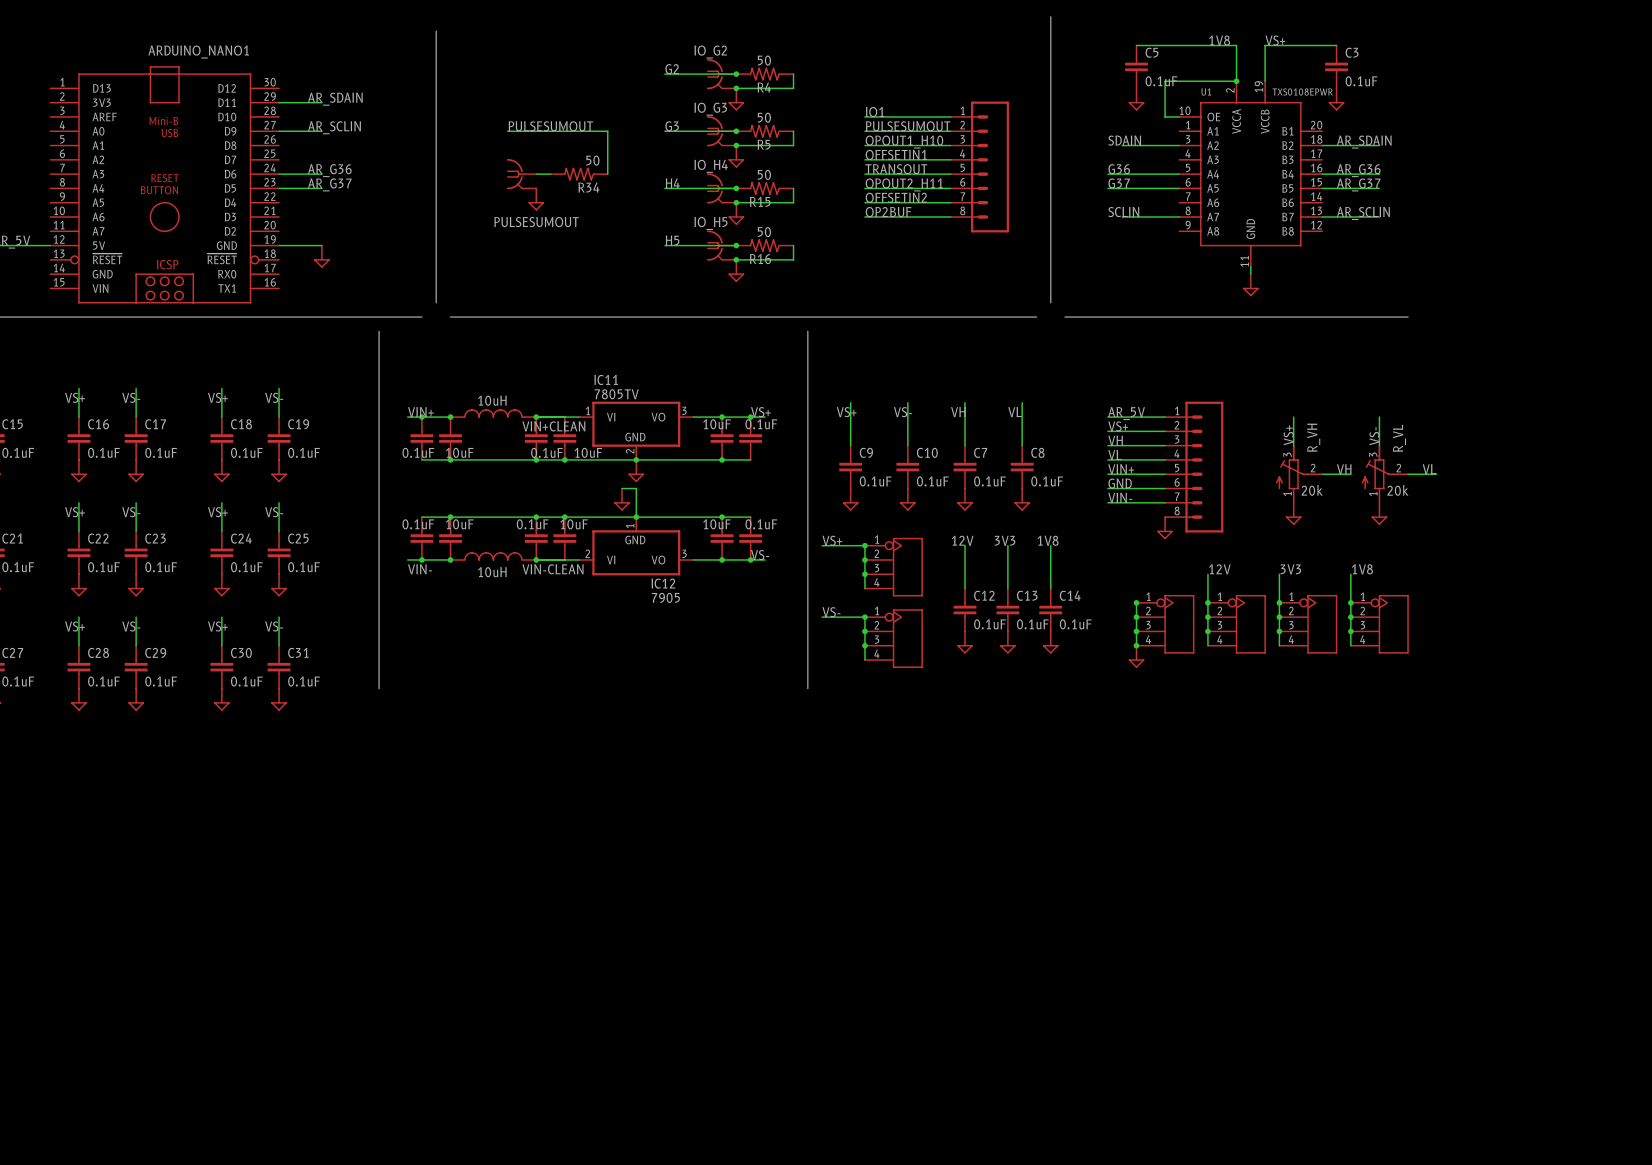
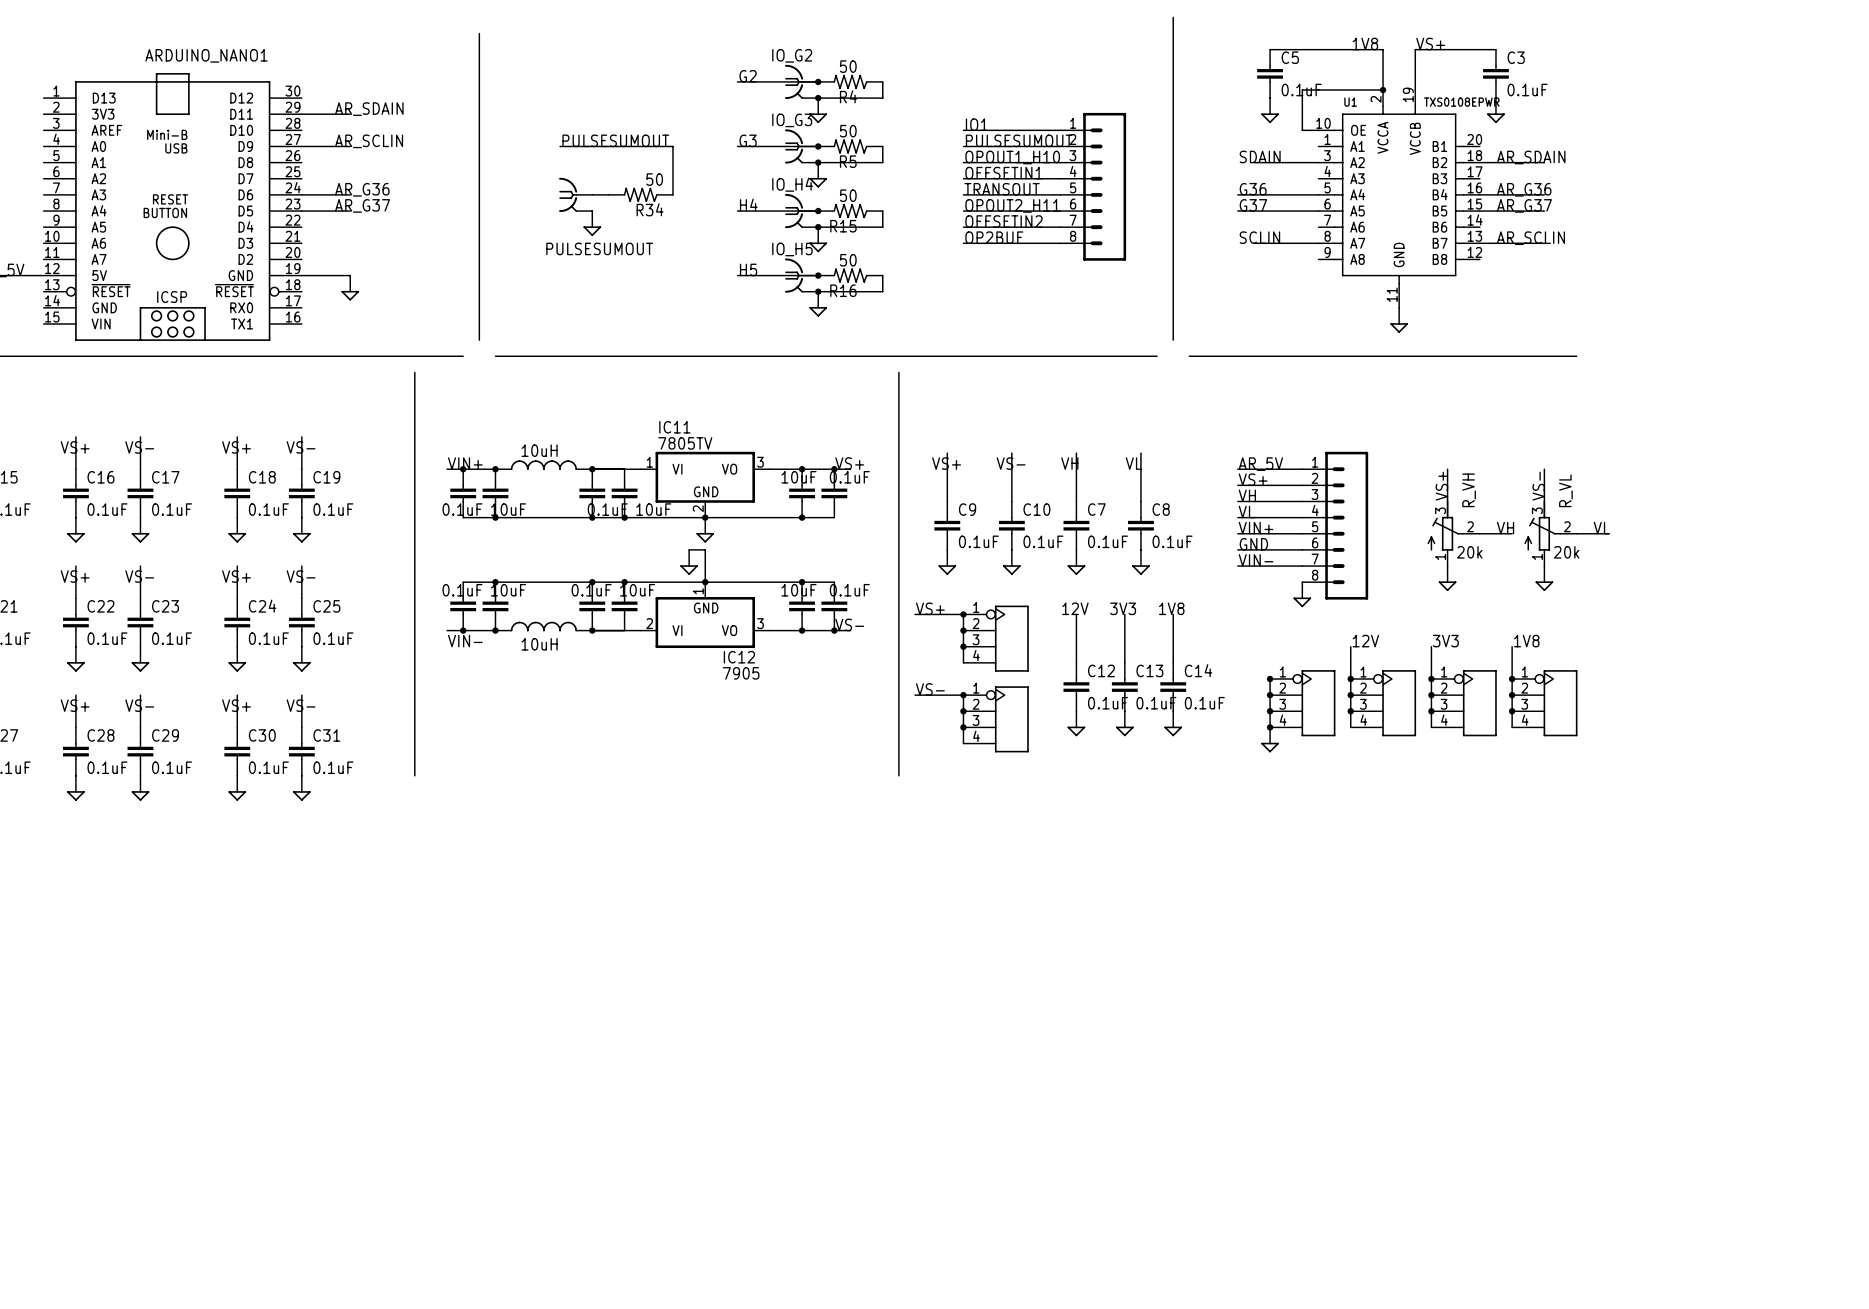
label: VIN+CLEAN (553, 426) -> none
label: VIN-CLEAN (552, 569) -> none

